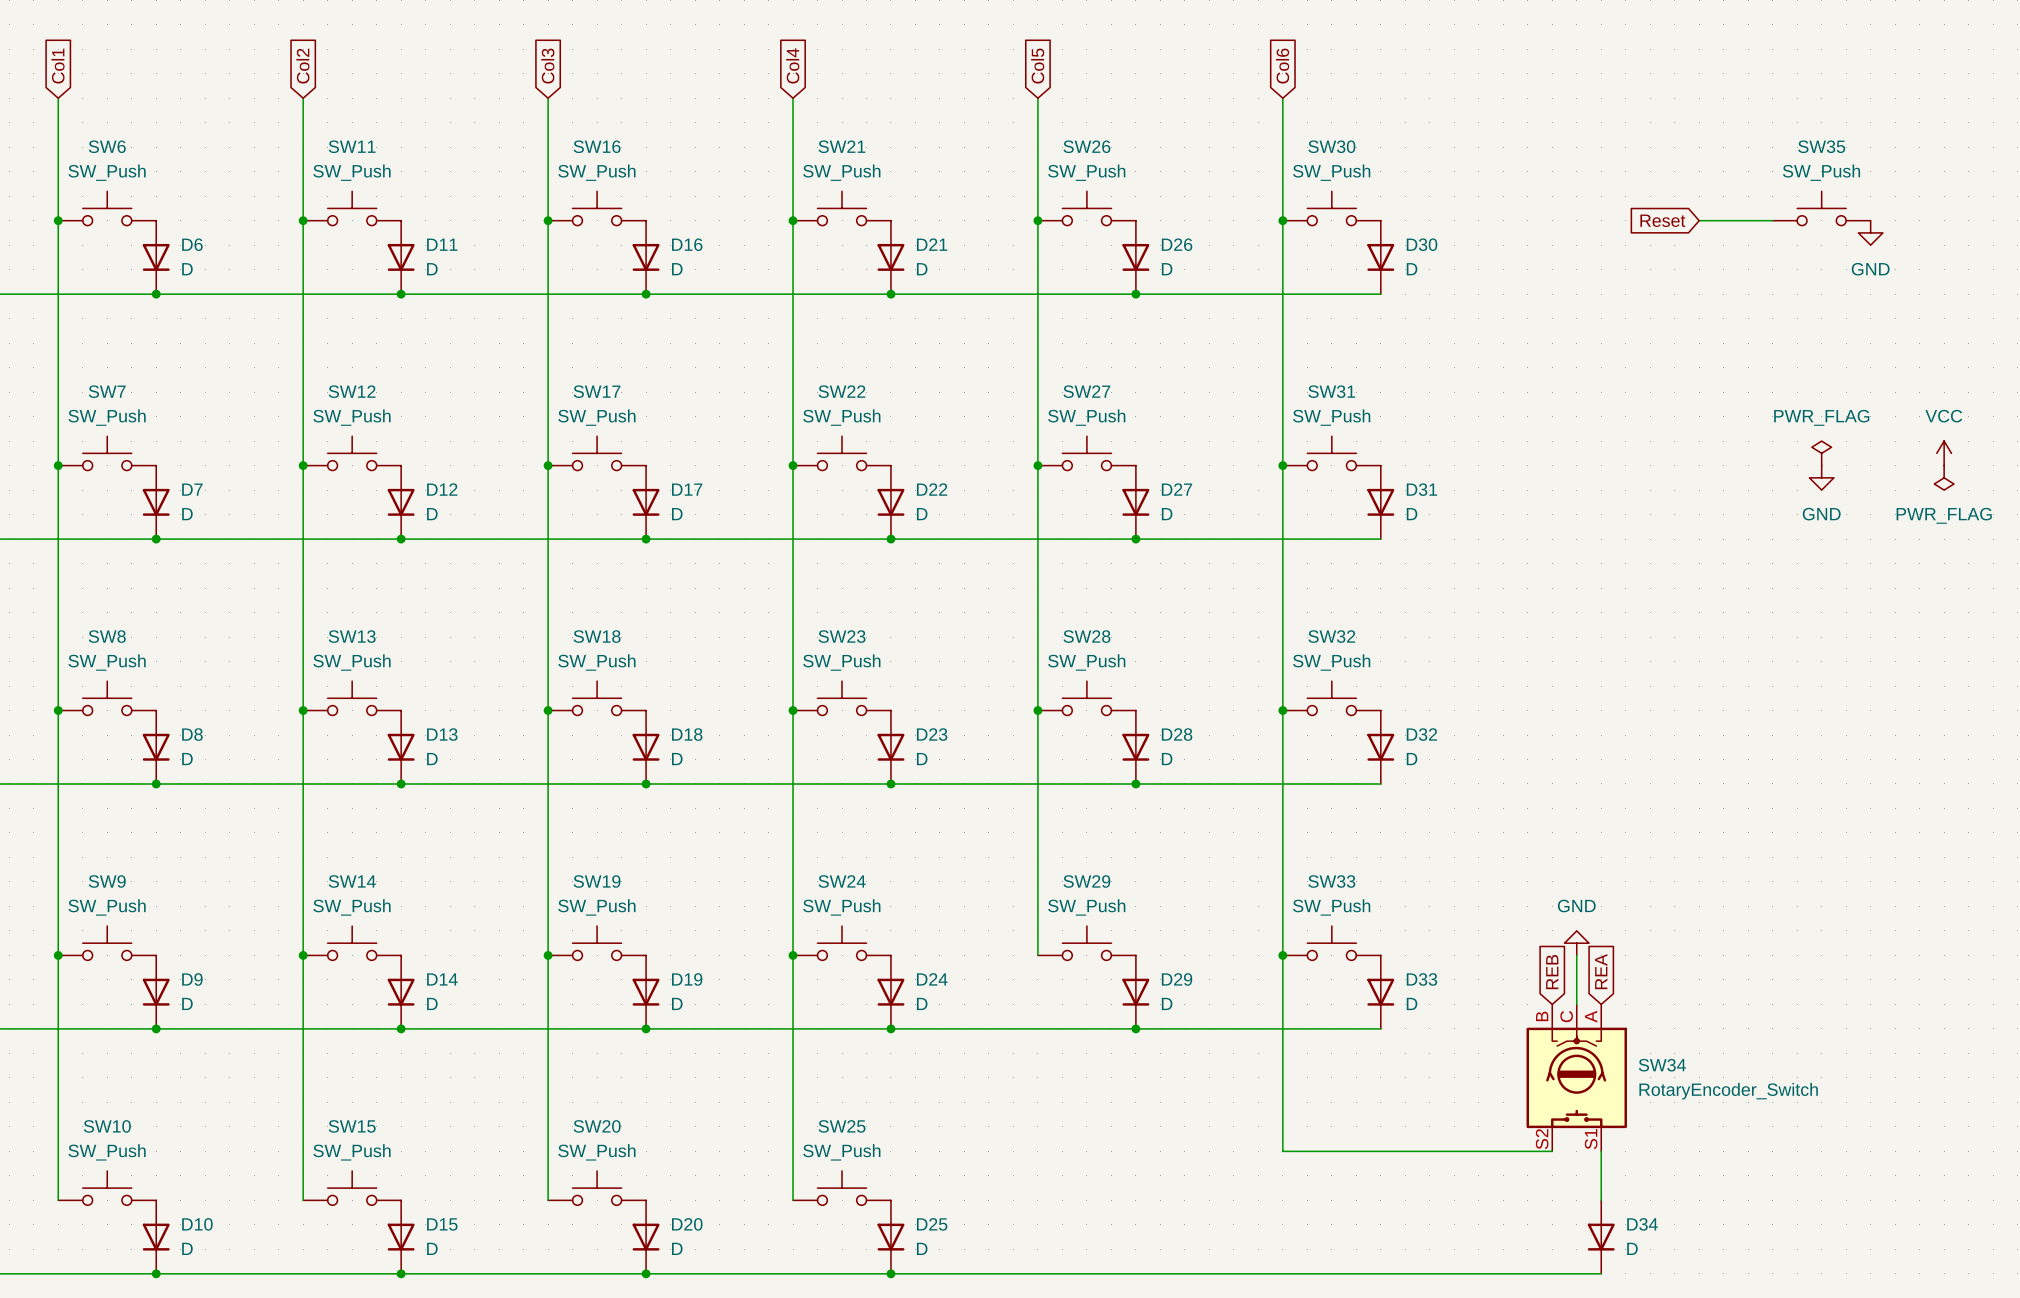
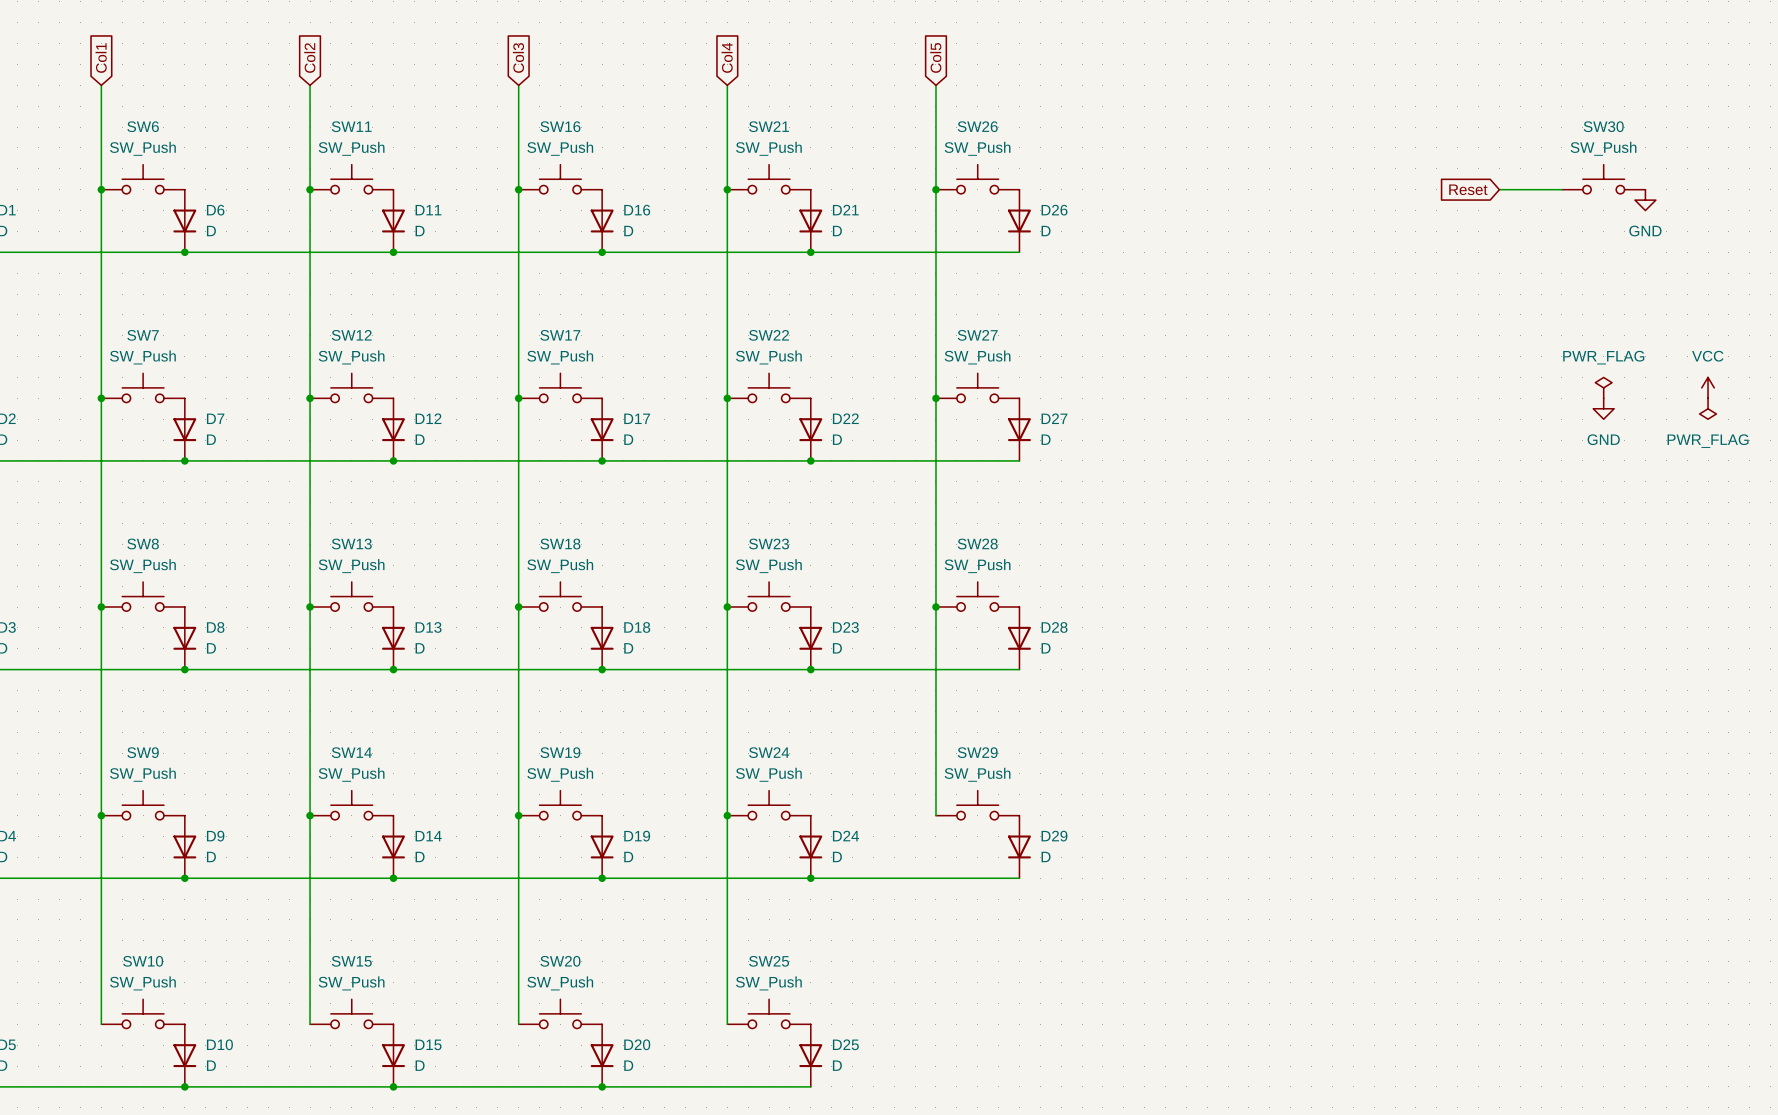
global label: Col6 (1282, 66) -> none
wire: (1282, 98) (1282, 1151) (1552, 1151) -> none
SW35 name: SW35 (1821, 146) -> SW30 (1603, 126)
SW30: SW_Push (1331, 208) -> none
junction: (1282, 220) -> none
D30: D (1380, 257) -> none
wire: (1135, 294) (1380, 294) -> none
junction: (1135, 294) -> none
SW31: SW_Push (1331, 453) -> none
junction: (1282, 465) -> none
D31: D (1380, 502) -> none
wire: (1135, 539) (1380, 539) -> none
junction: (1135, 539) -> none
SW32: SW_Push (1331, 698) -> none
junction: (1282, 710) -> none
D32: D (1380, 747) -> none
wire: (1135, 783) (1380, 783) -> none
junction: (1135, 783) -> none
SW33: SW_Push (1331, 943) -> none
power symbol: GND (1576, 943) -> none
junction: (1282, 955) -> none
wire: (1576, 955) (1576, 1004) -> none
global label: REA (1601, 971) -> none
global label: REB (1552, 972) -> none
D33: D (1380, 992) -> none
wire: (1135, 1028) (1380, 1028) -> none
junction: (1135, 1028) -> none
SW34: RotaryEncoder_Switch (1576, 1077) -> none
wire: (1601, 1151) (1601, 1200) -> none
D34: D (1601, 1237) -> none
wire: (890, 1273) (1601, 1273) -> none
junction: (890, 1273) -> none

